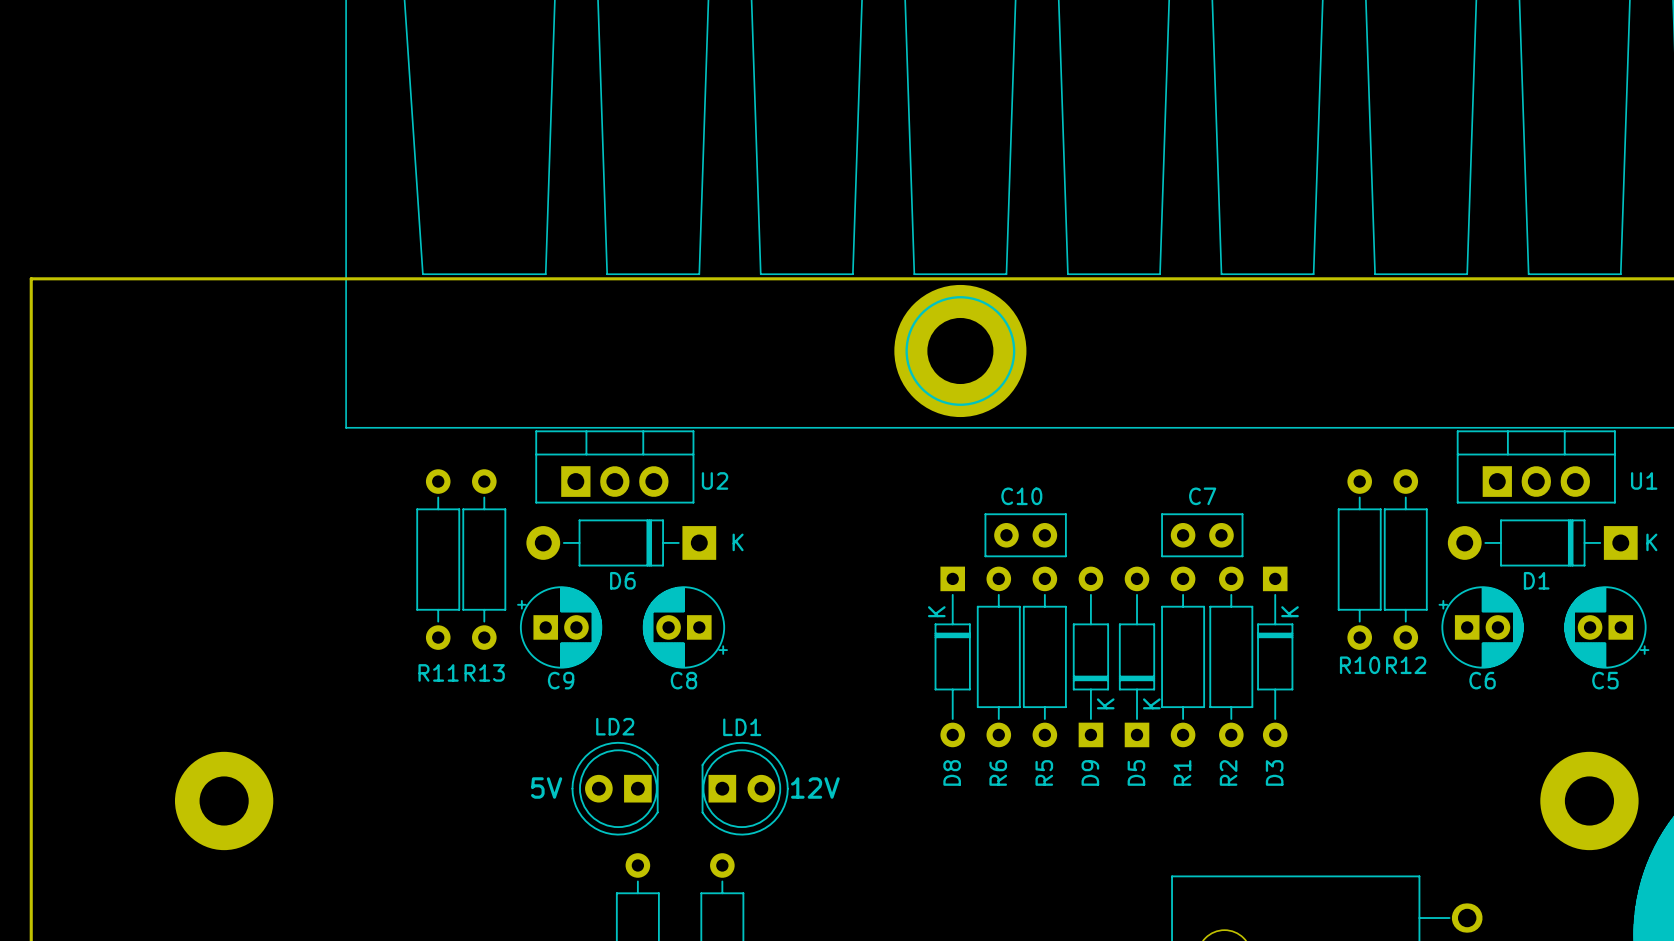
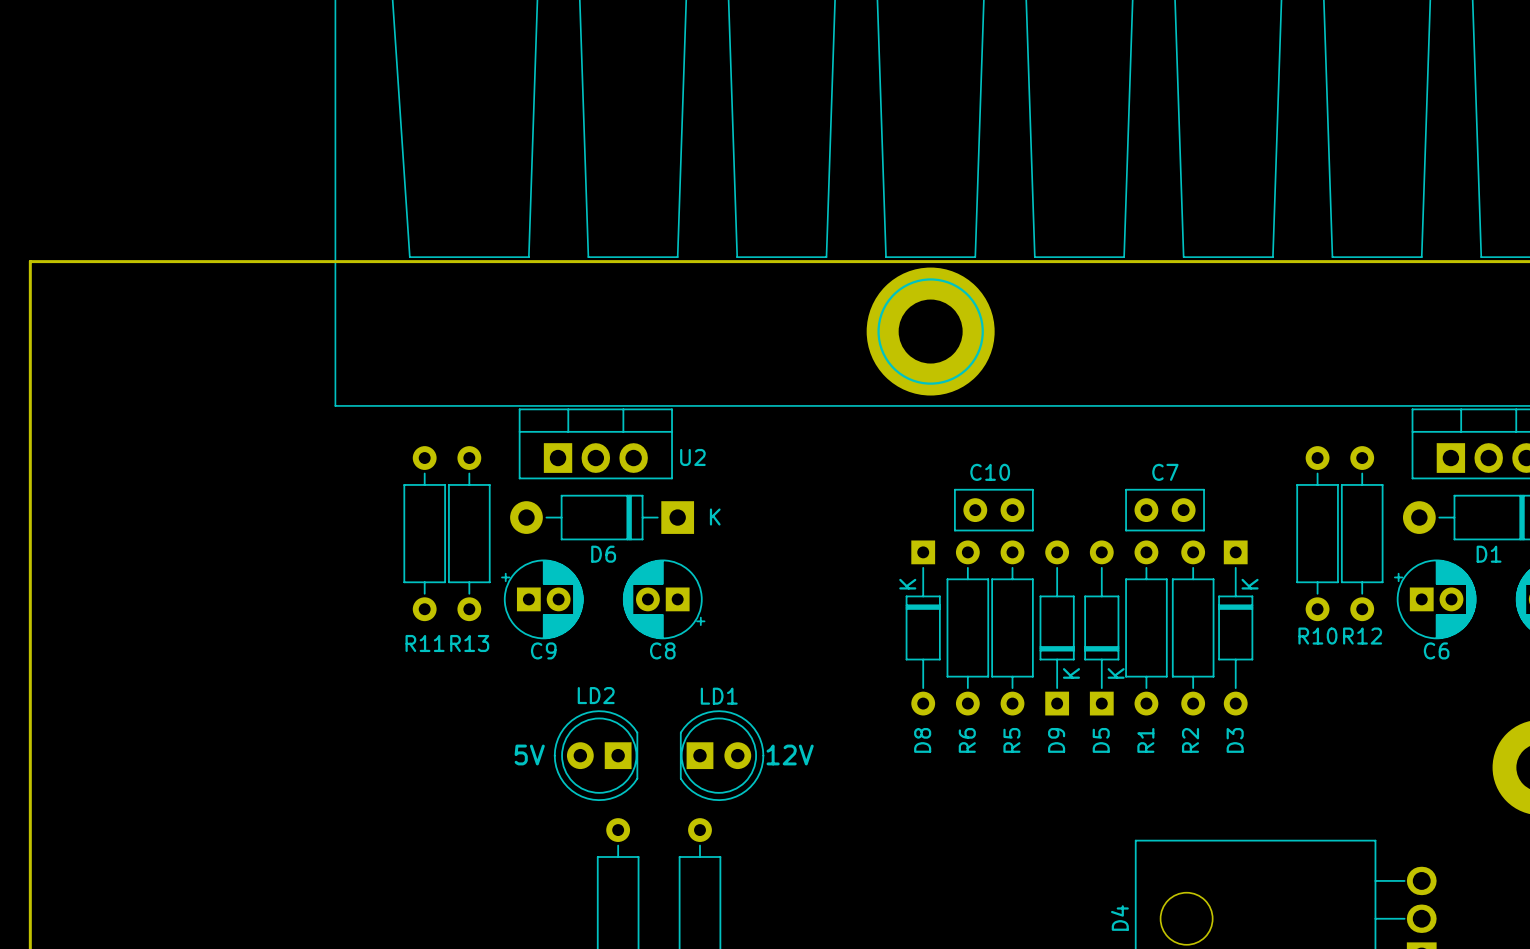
part: (224, 800) -> none

